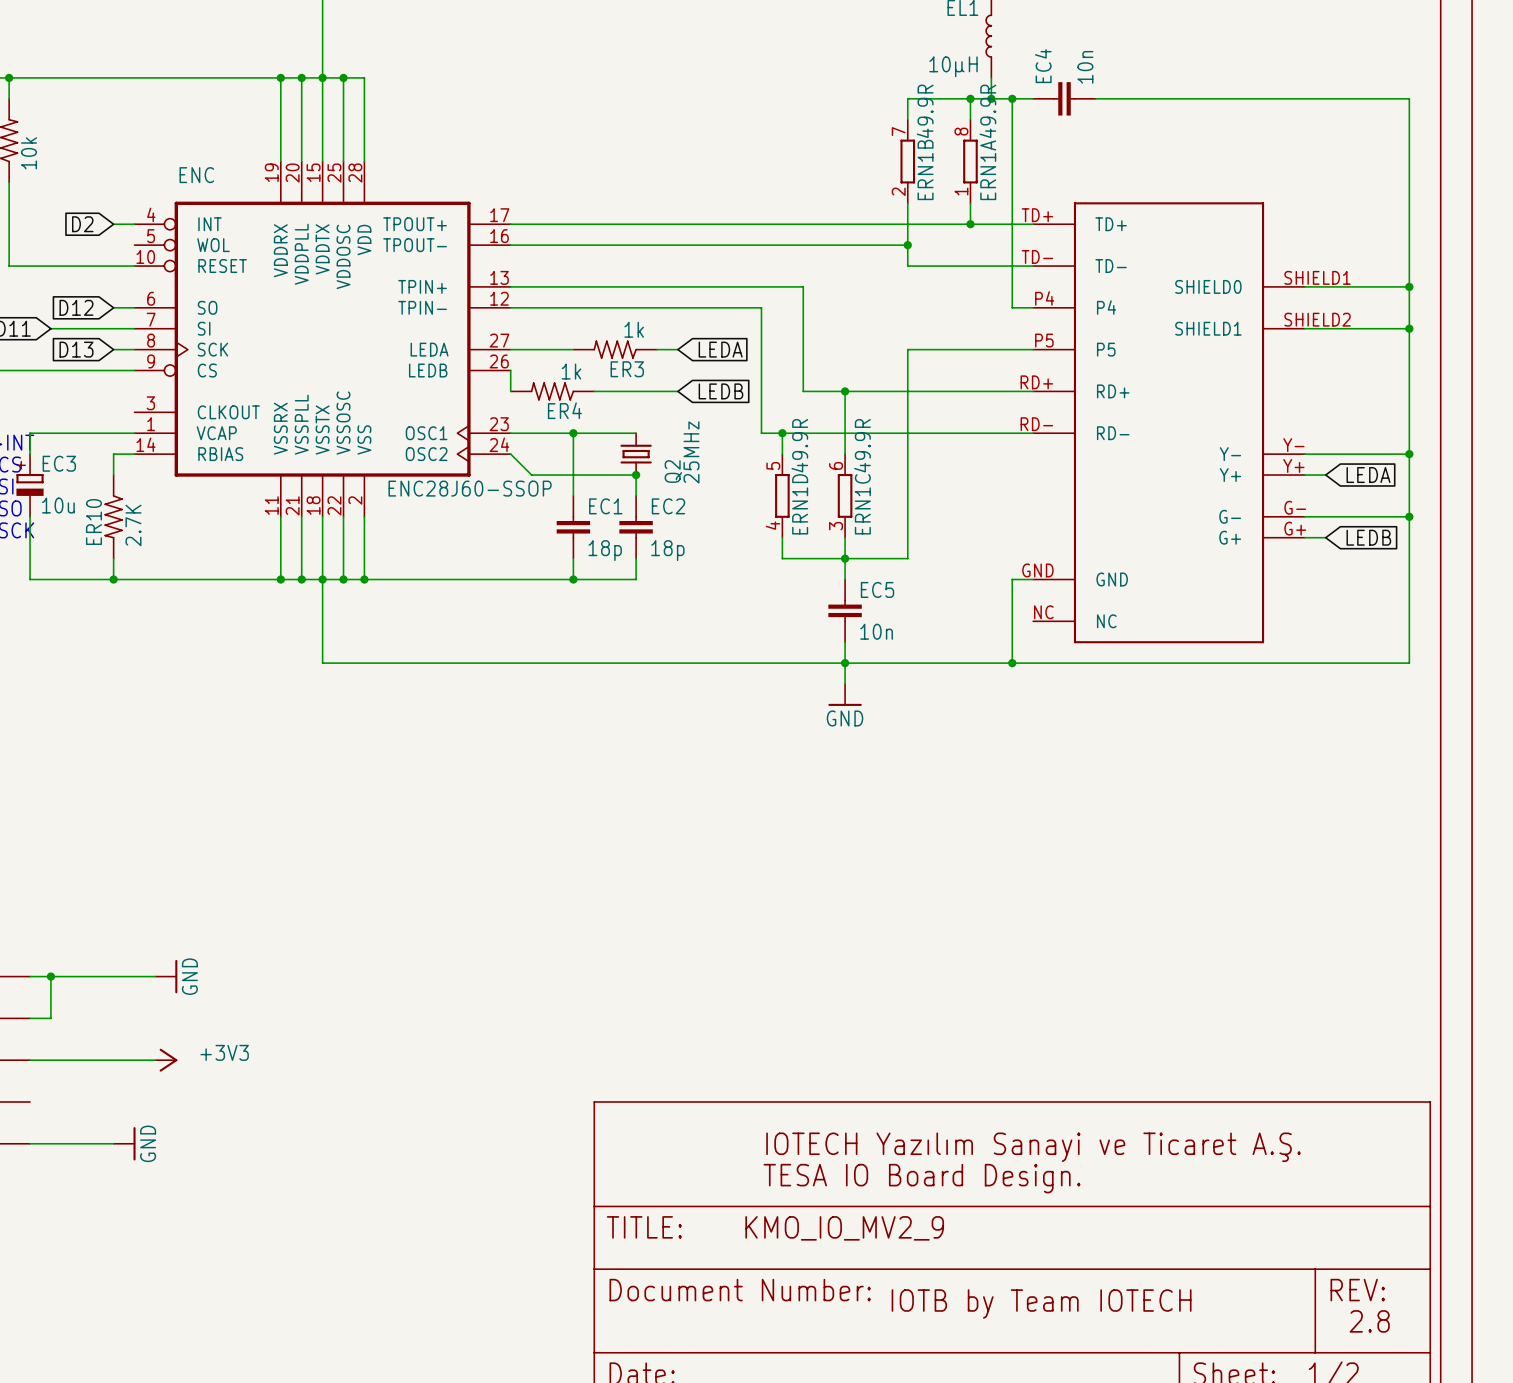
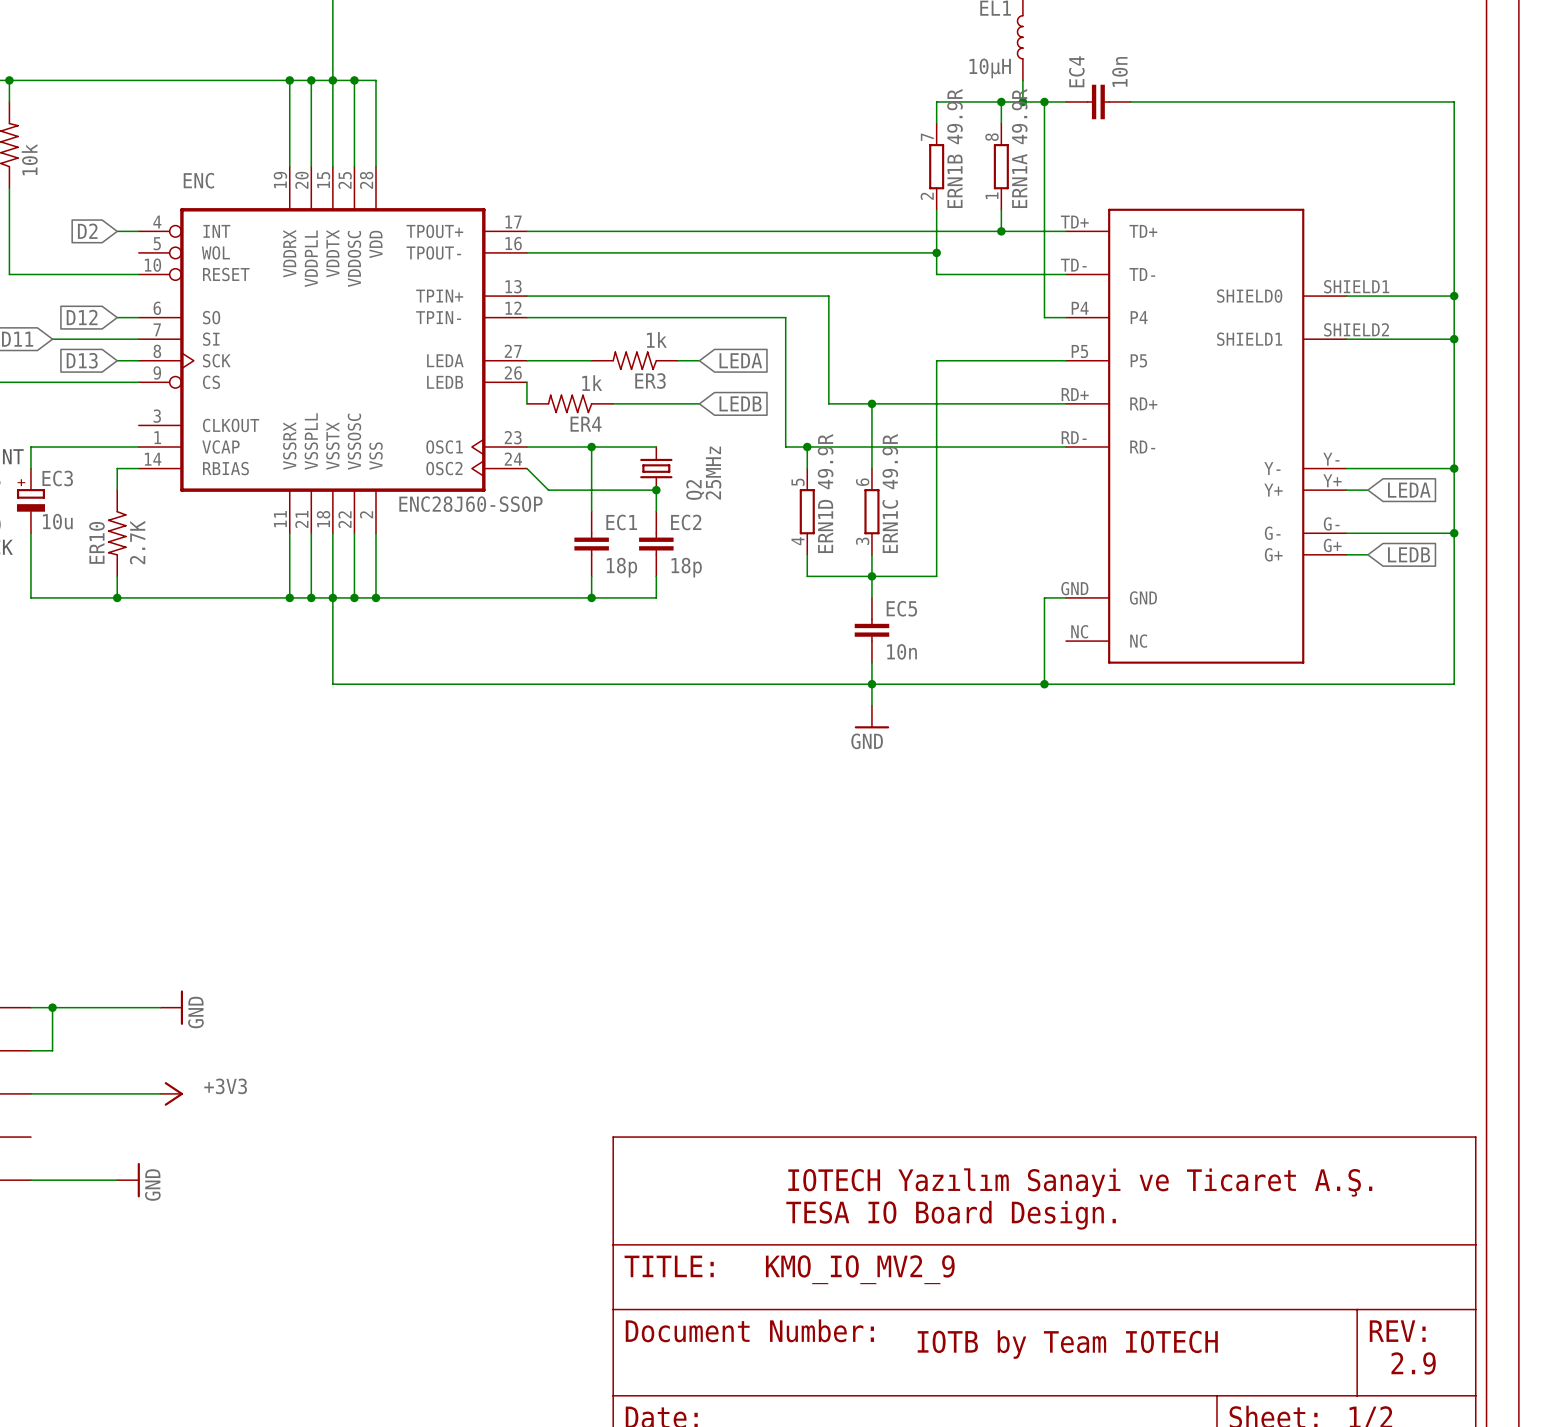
text: 2.8 (1369, 1321) -> 2.9 (1413, 1363)

